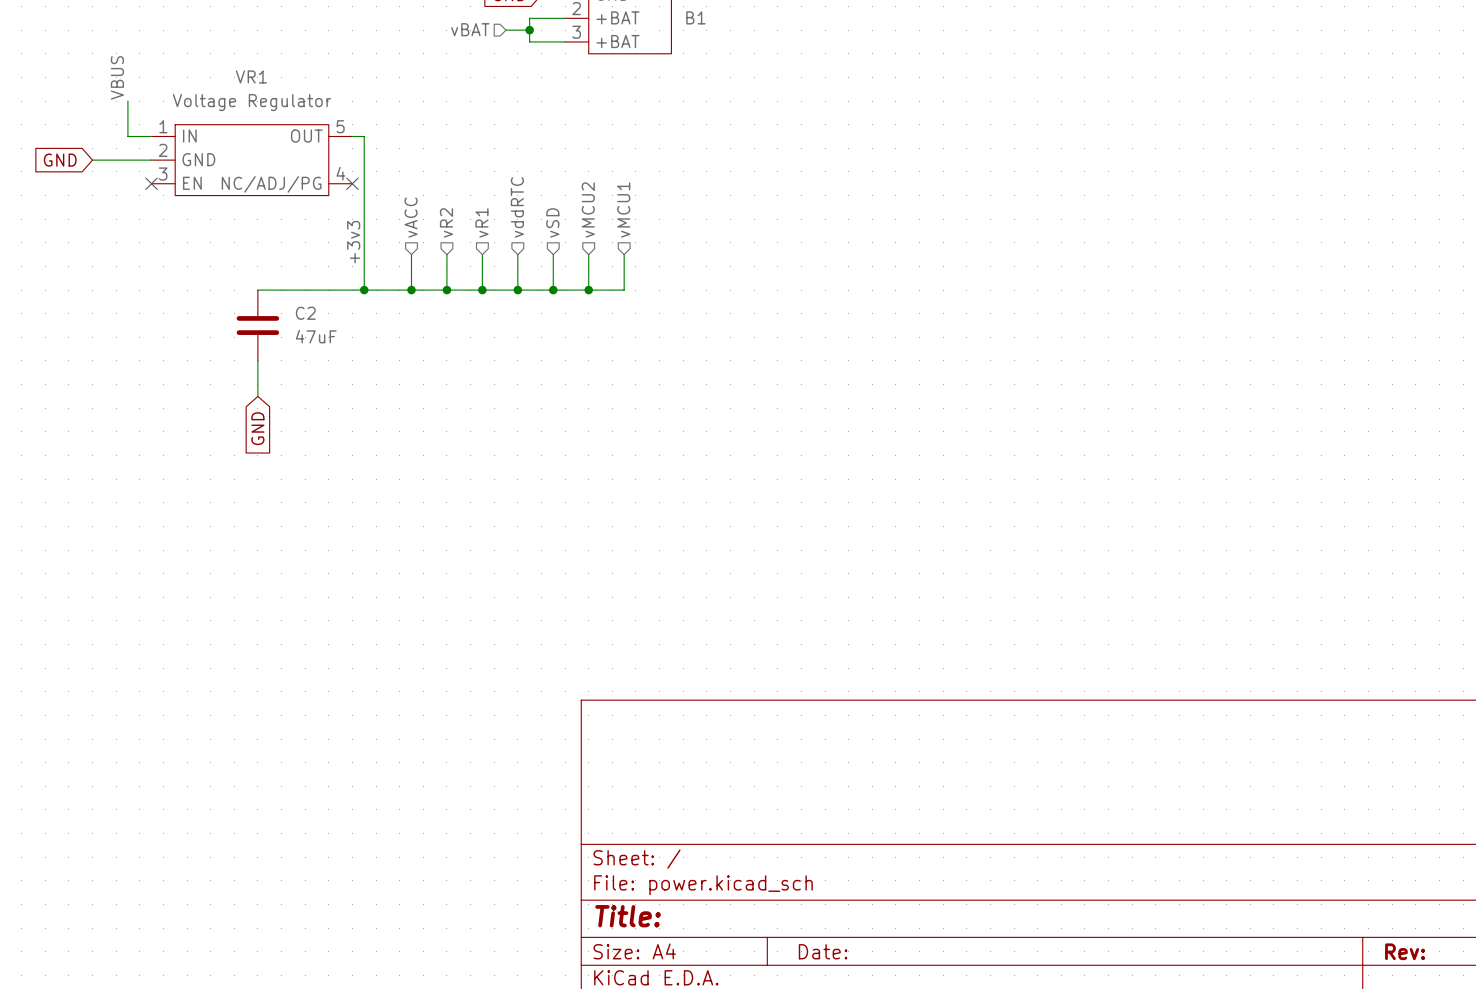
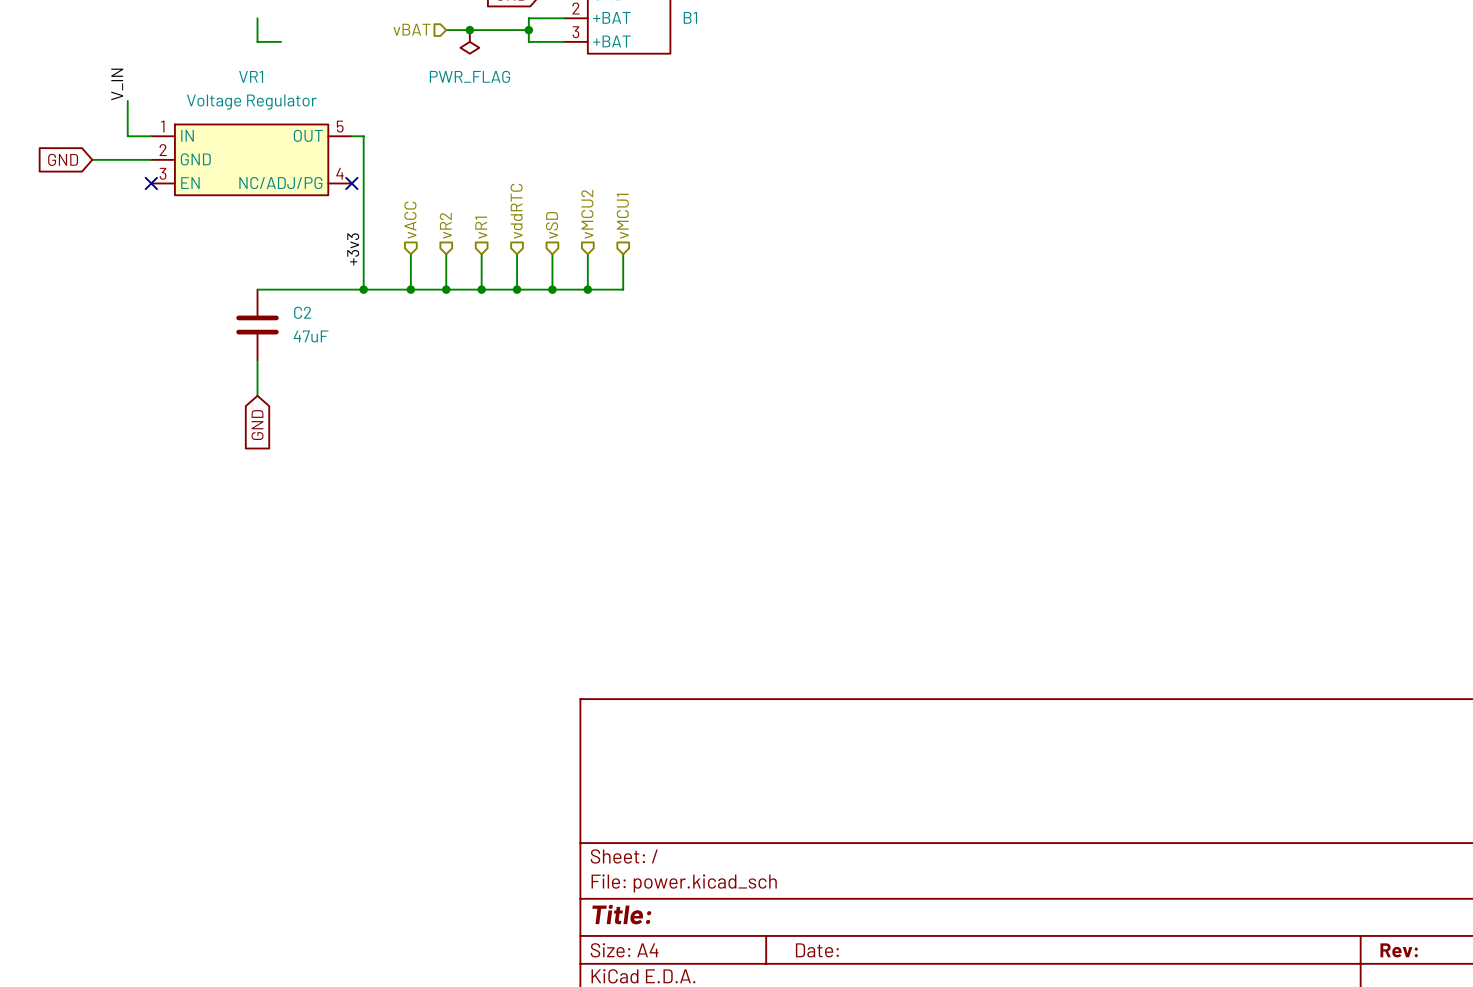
wire: none -> (257, 18) (257, 41) (281, 41)
hierarchical label position: vBAT (470, 29) -> vBAT (411, 29)
wire: none -> (446, 30) (505, 30)
junction: none -> (469, 30)
power symbol: none -> PWR_FLAG (469, 41)
label: VBUS (117, 77) -> V_IN (117, 84)

